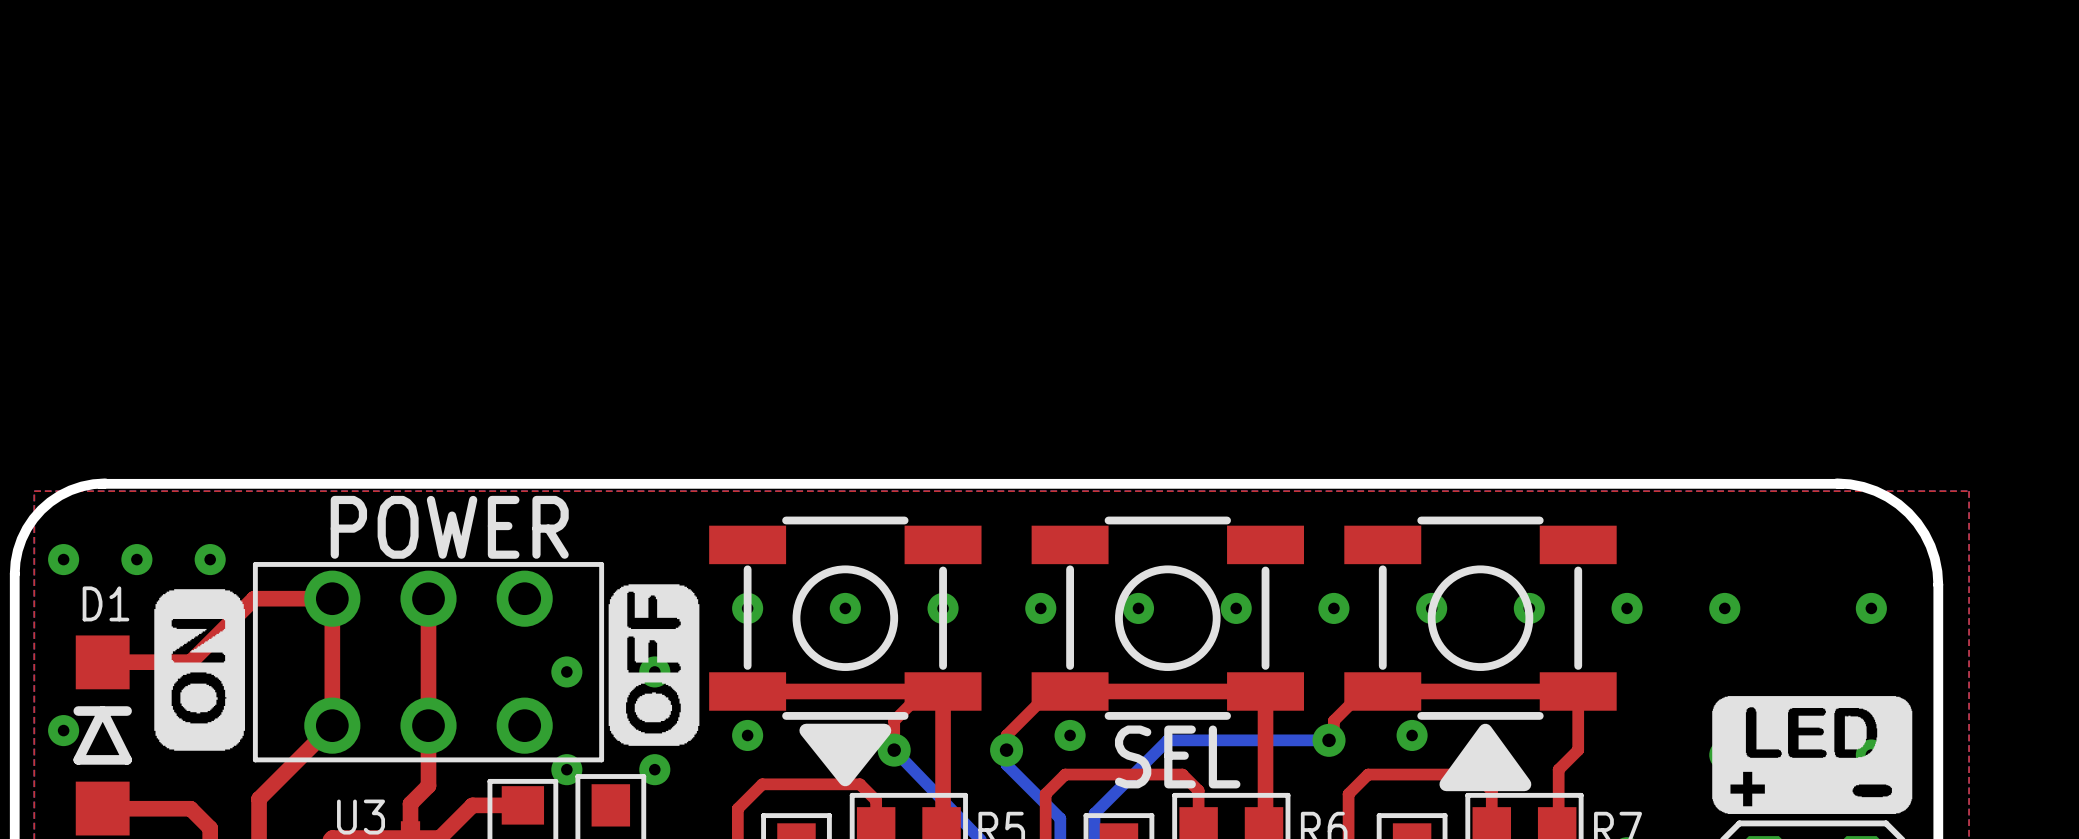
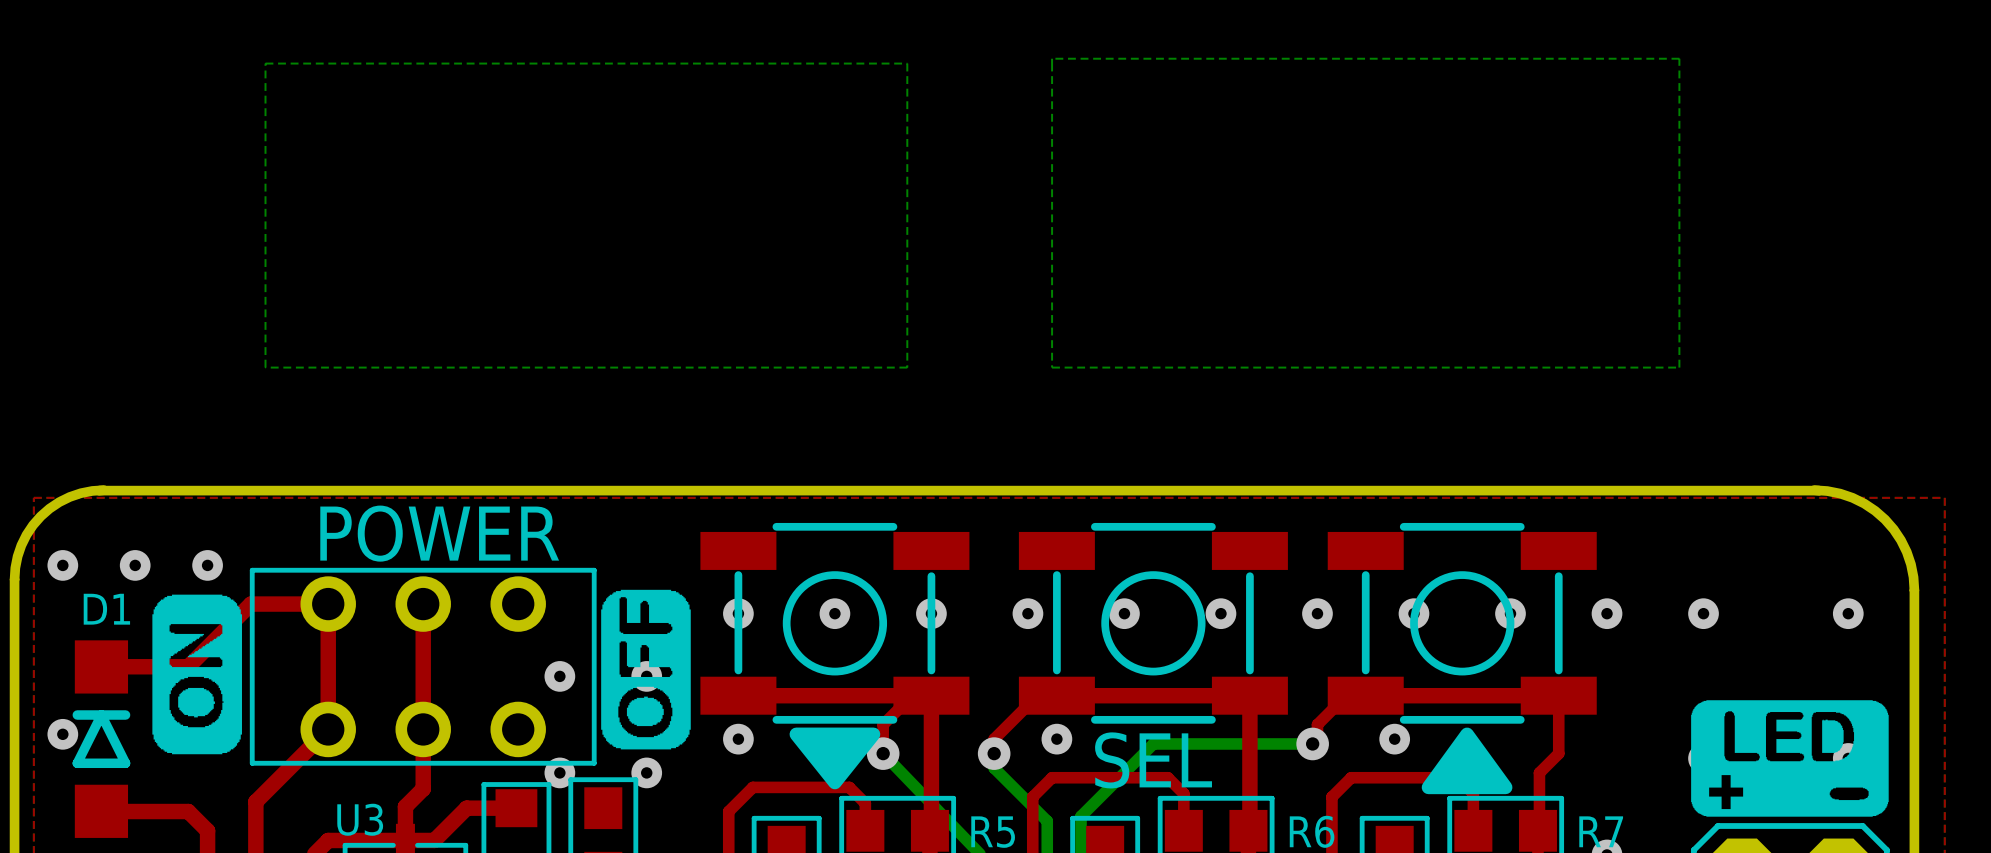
bottom zone outline: none -> (1052, 58) (1052, 367) (1679, 367) (1679, 58) (1052, 58)
bottom zone outline: none -> (265, 63) (907, 63) (907, 367) (265, 367) (265, 63)

